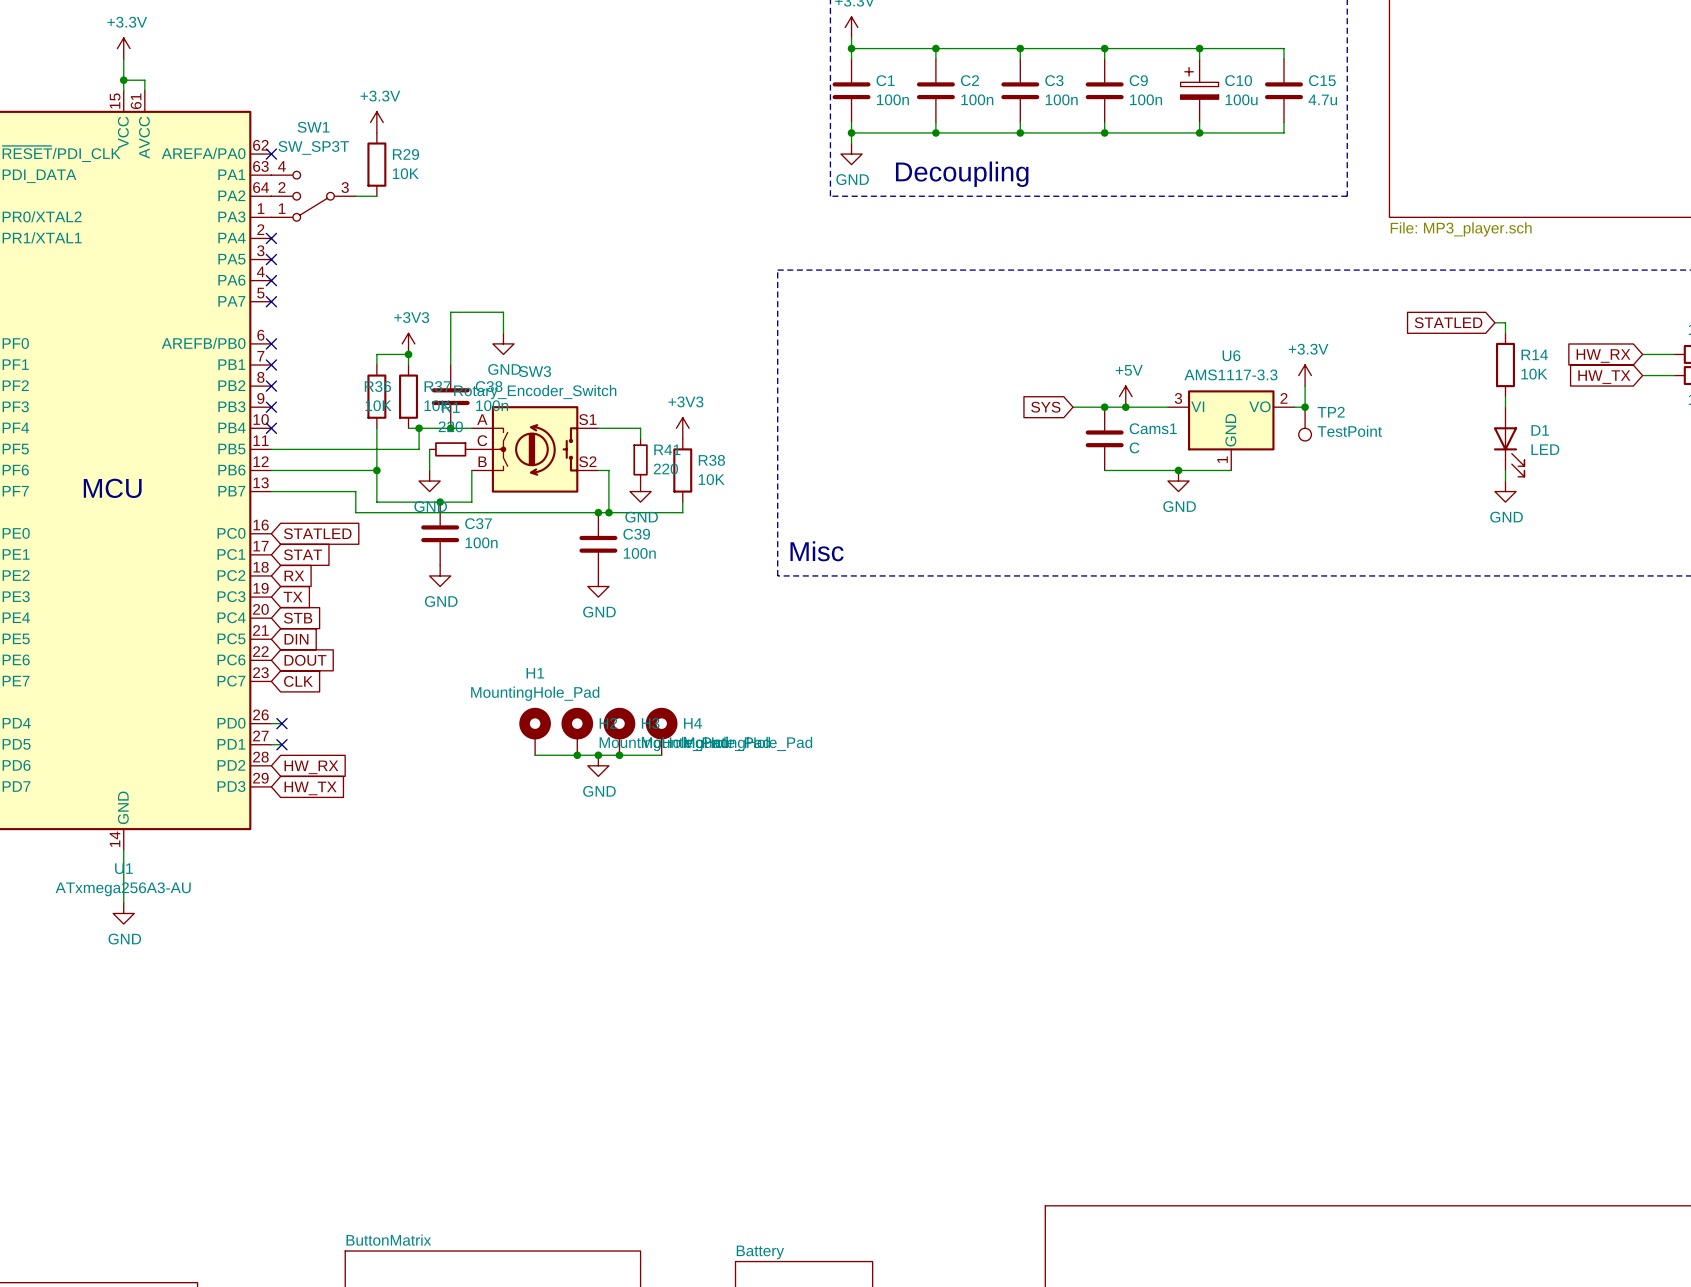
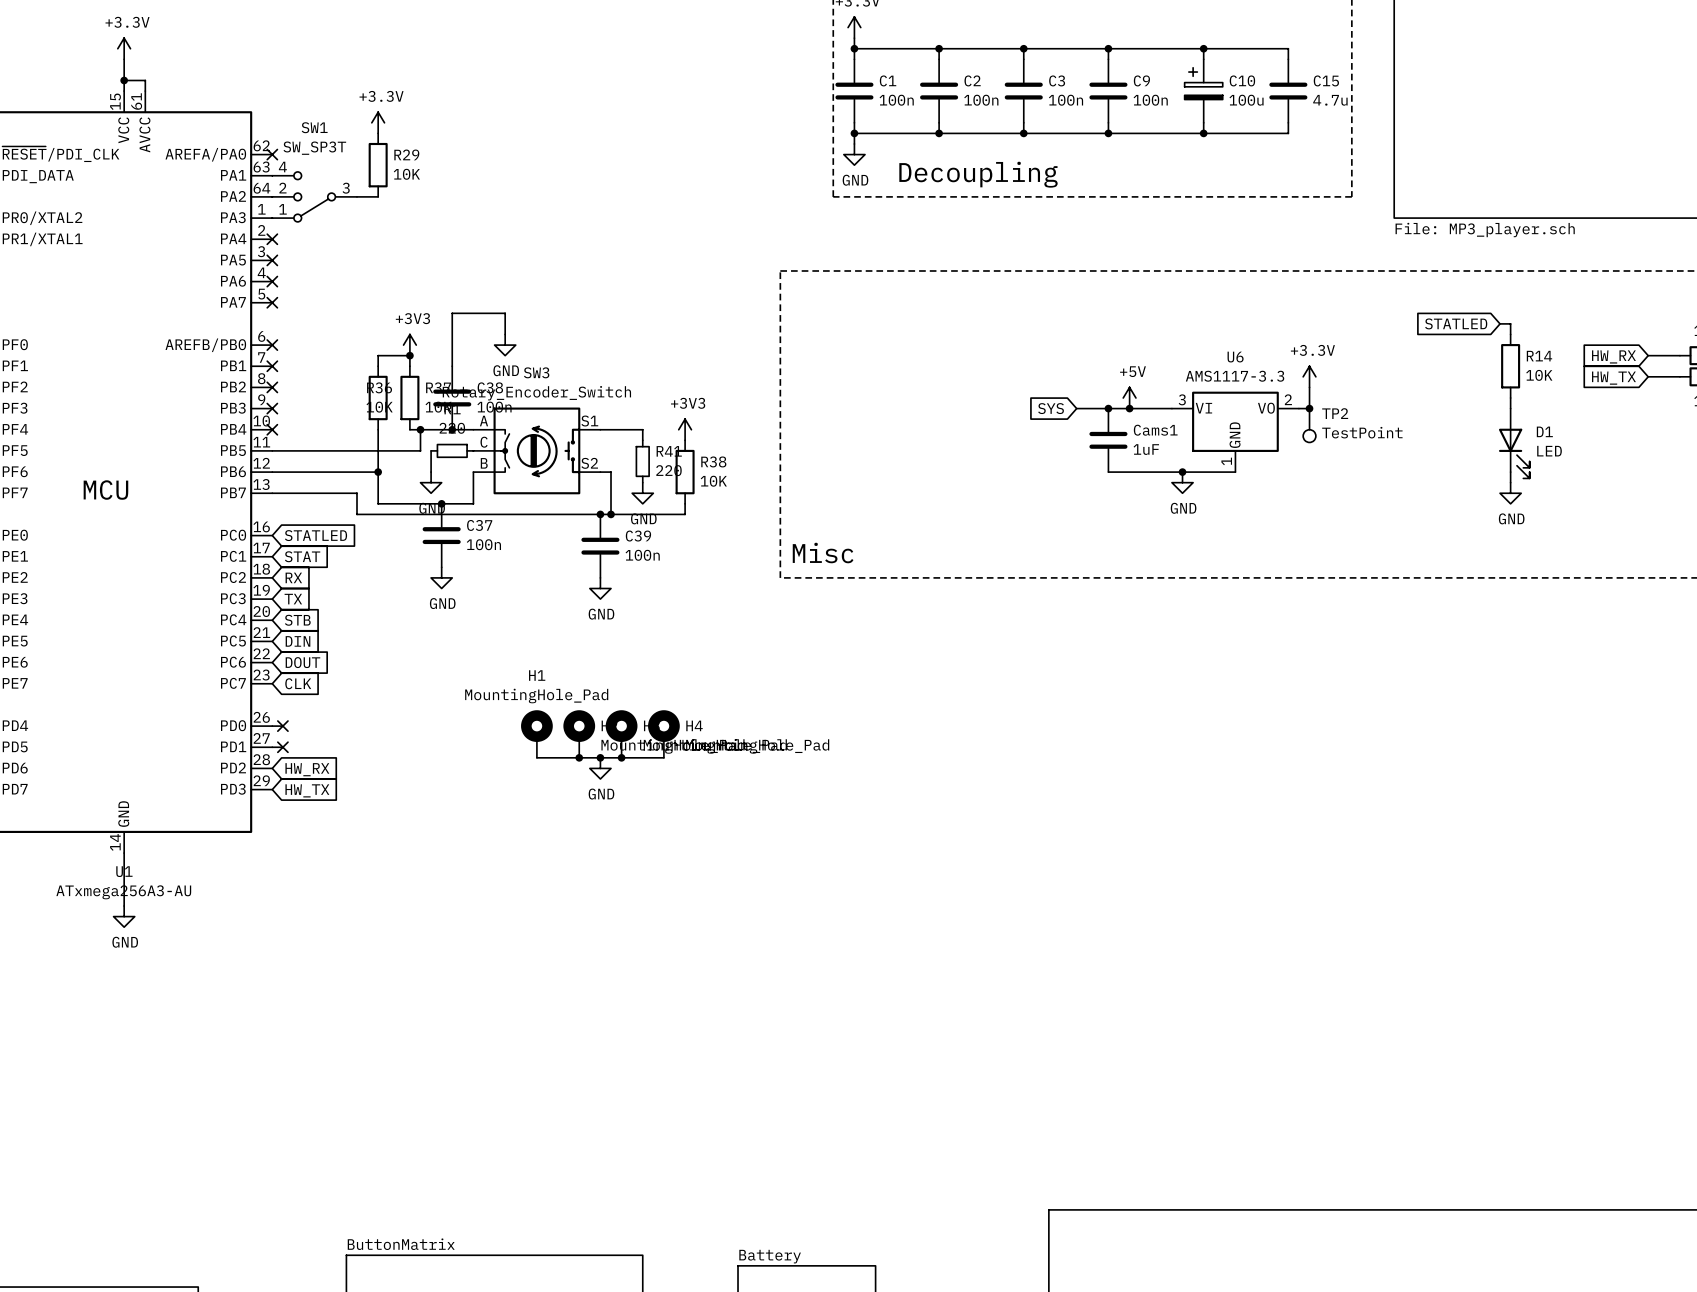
Cams1 value: C (1134, 447) -> 1uF (1146, 449)

